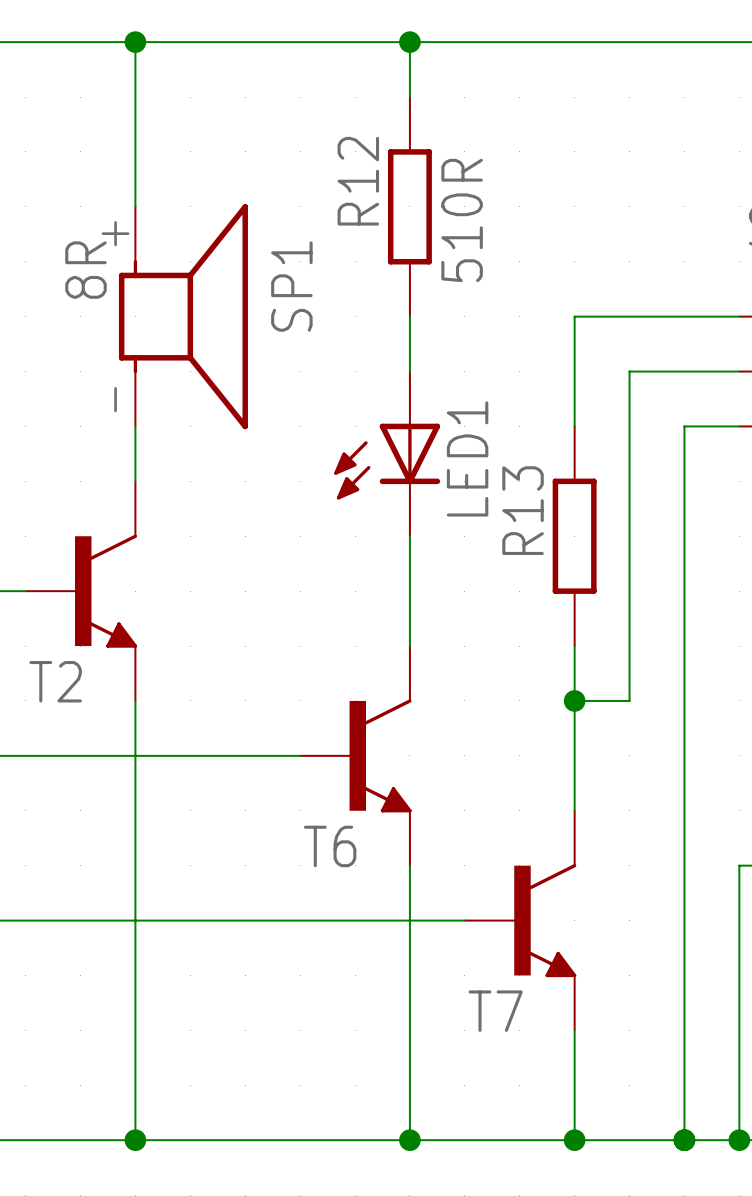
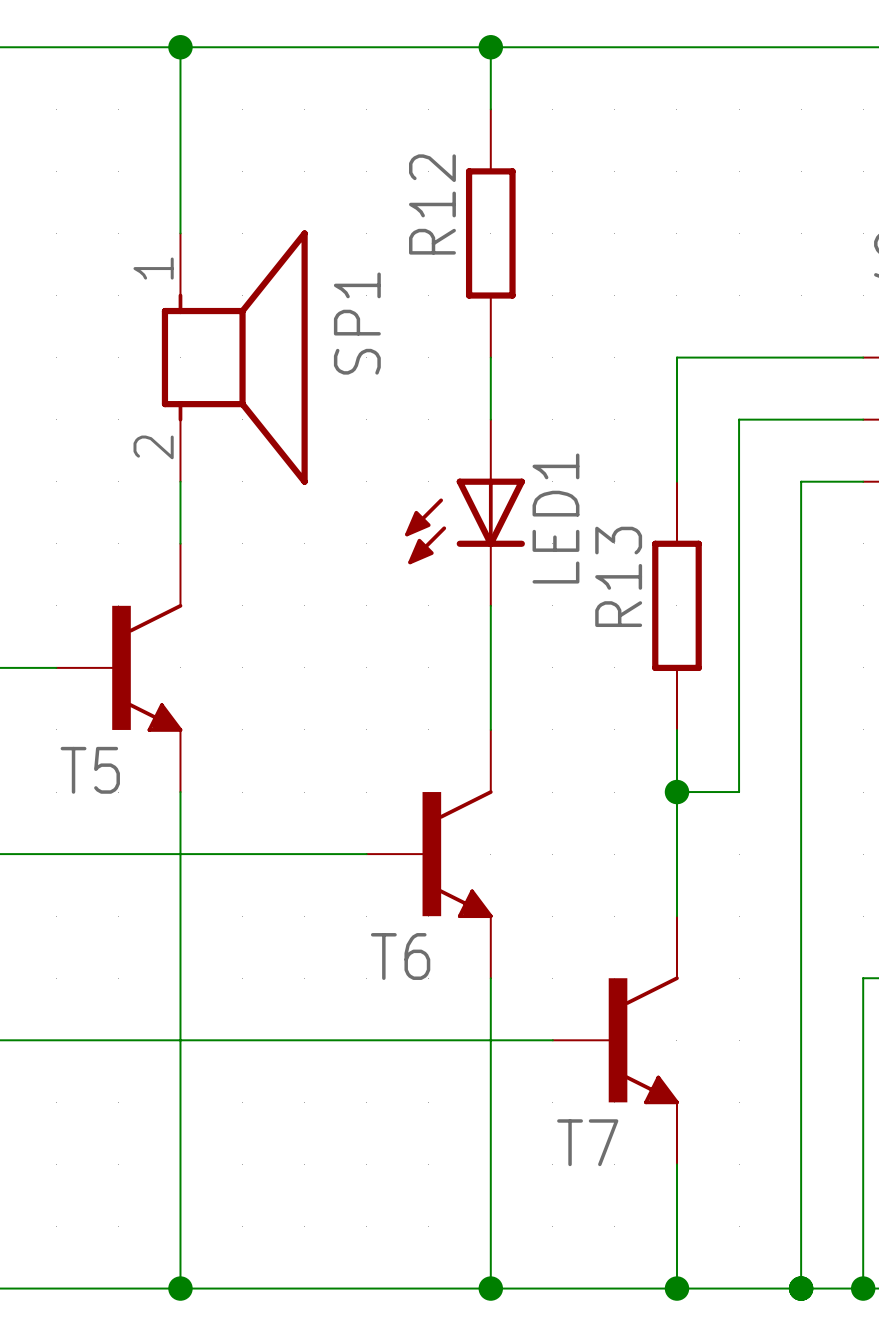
R12 value: 510R (462, 220) -> none
SP1 pin number: + (115, 233) -> 1 (153, 268)
SP1 value: 8R (86, 270) -> none
SP1 pin number: - (115, 399) -> 2 (153, 447)
T2 name: T2 (55, 681) -> T5 (90, 770)

